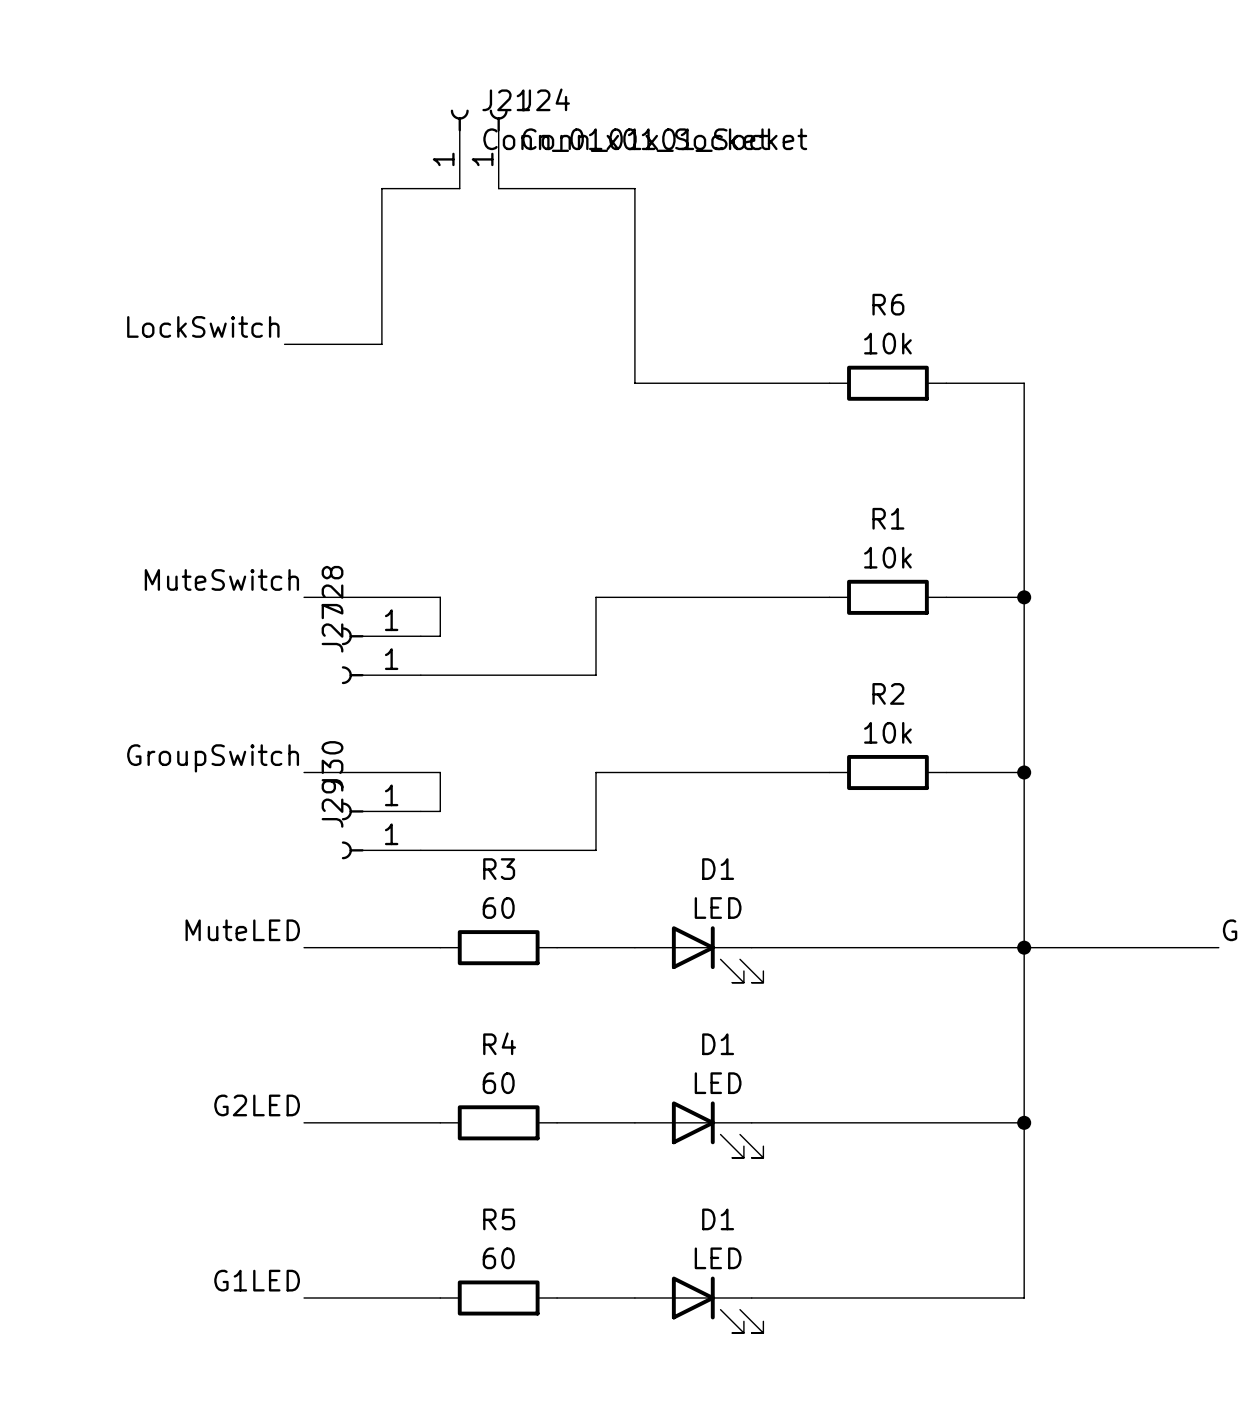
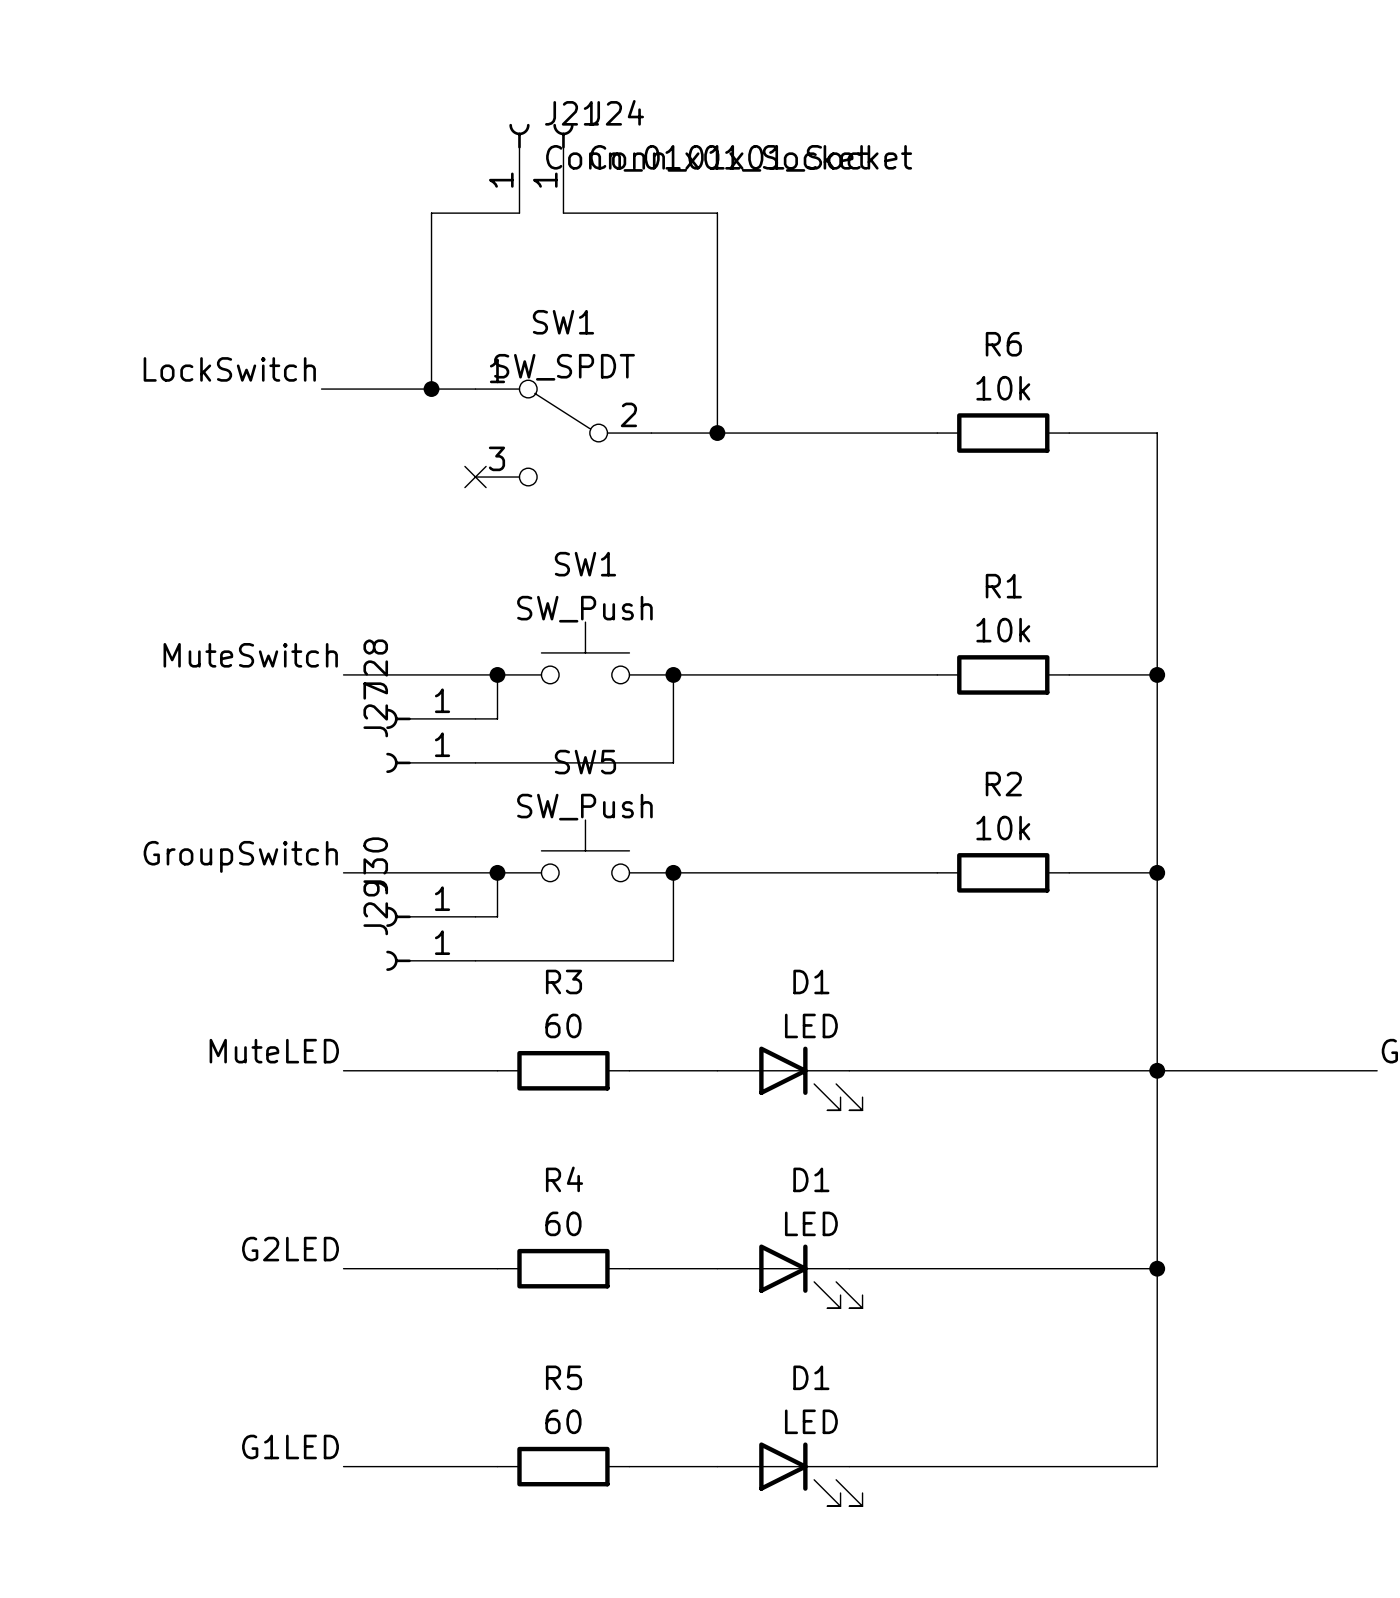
wire: none -> (431, 389) (475, 389)
junction: none -> (431, 389)
SW1: none -> SW_SPDT (563, 433)
wire: none -> (651, 433) (717, 433)
junction: none -> (717, 433)
no-connect mark: none -> (475, 477)
SW1: none -> SW_Push (585, 652)
junction: none -> (497, 674)
junction: none -> (673, 674)
SW5: none -> SW_Push (585, 850)
junction: none -> (497, 872)
junction: none -> (673, 872)

